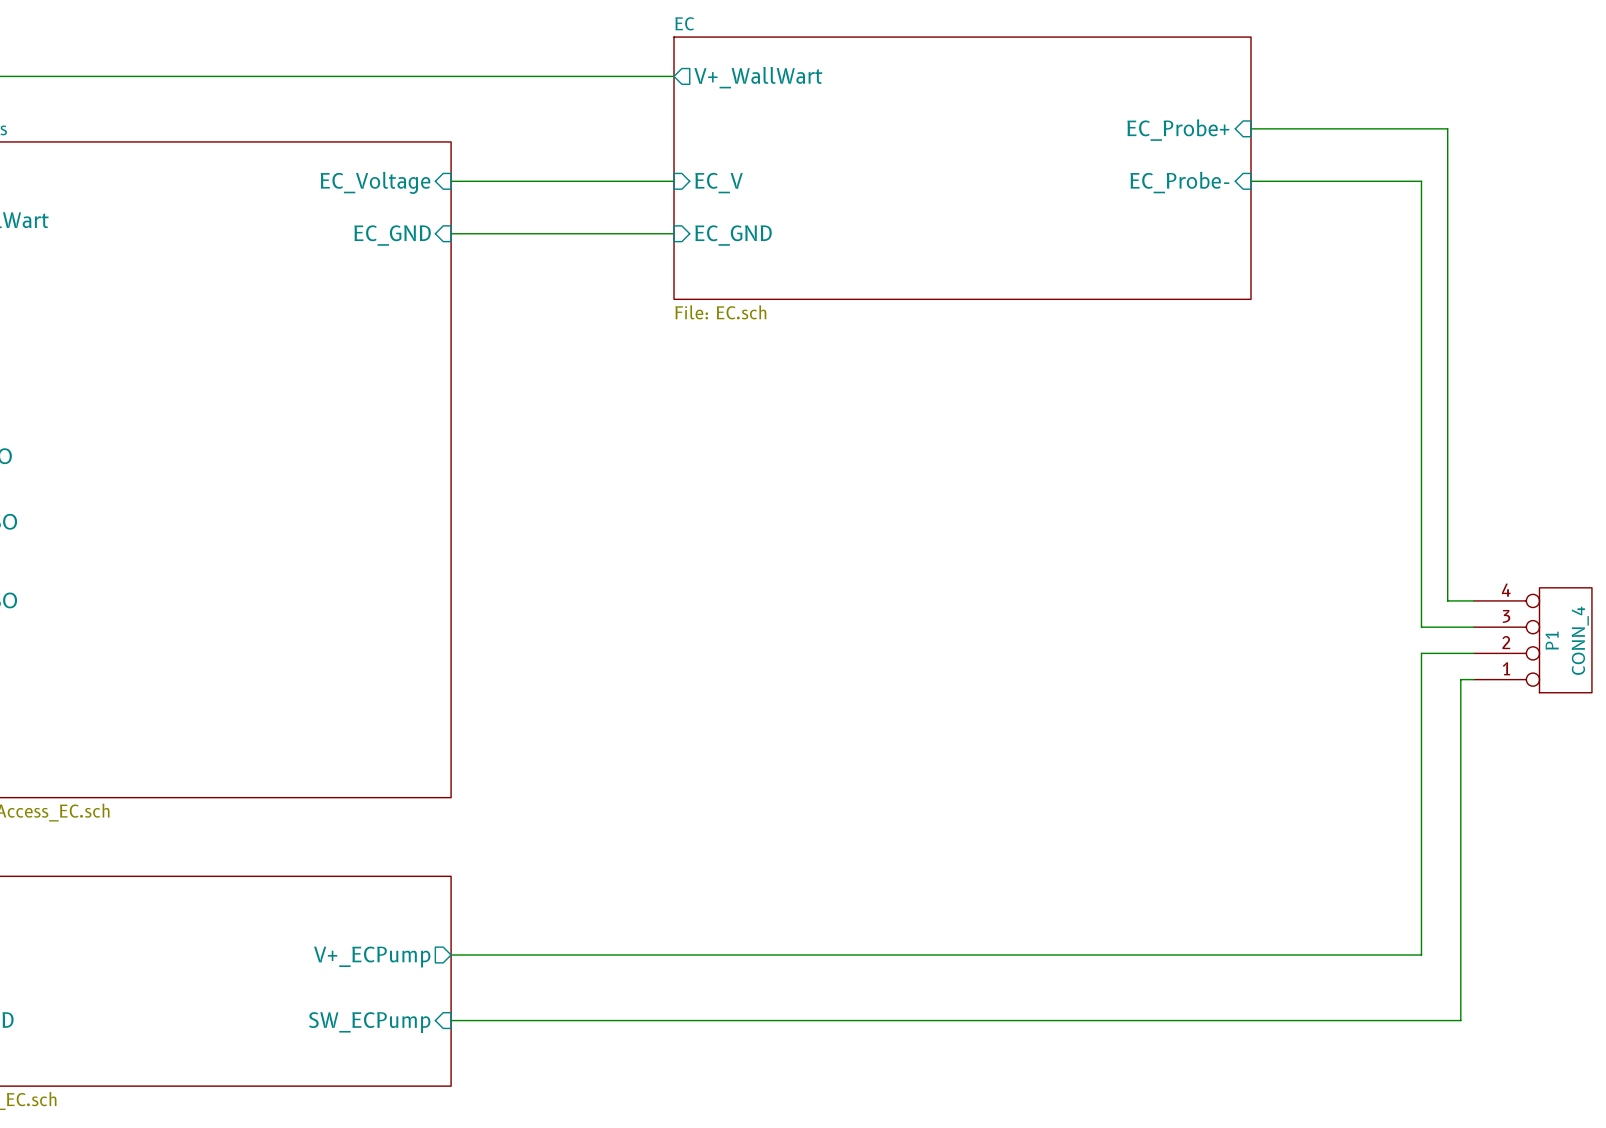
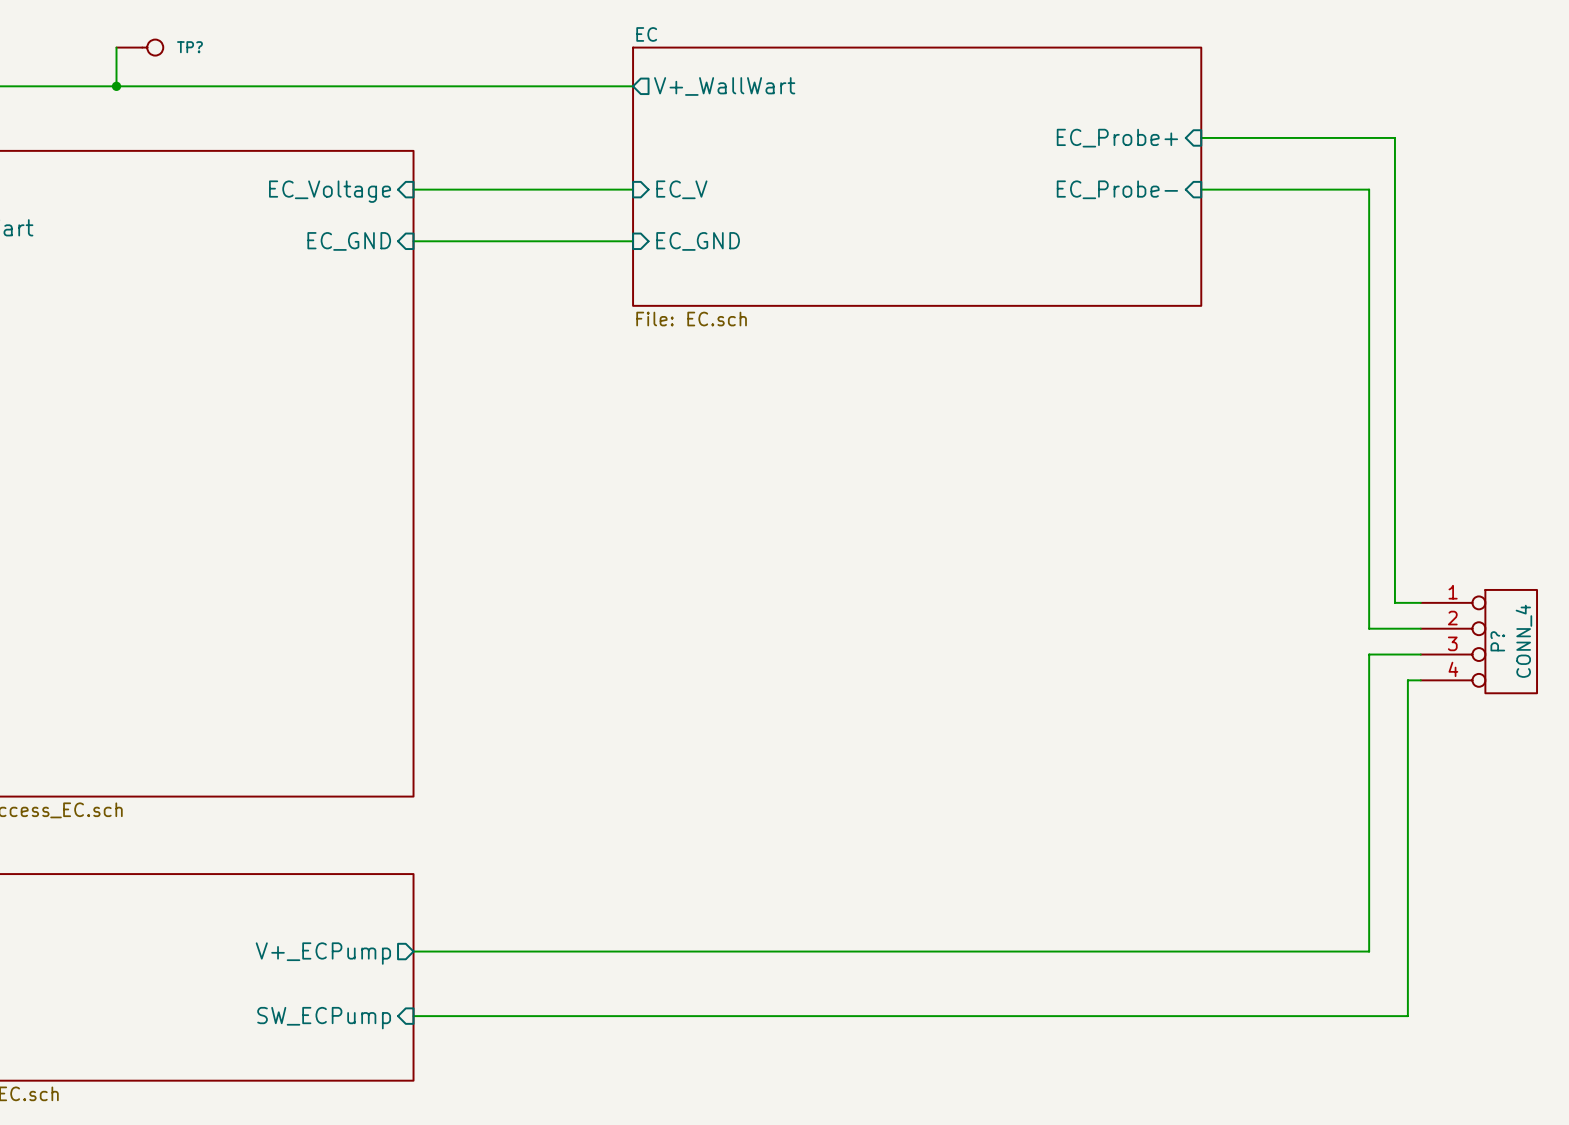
wire: none -> (116, 47) (116, 86)
TP?: none -> (139, 47)
junction: none -> (116, 86)
P1 name: P1 (1552, 640) -> P? (1497, 641)
P1 flip: as is (1565, 640) -> up-down (1511, 641)

